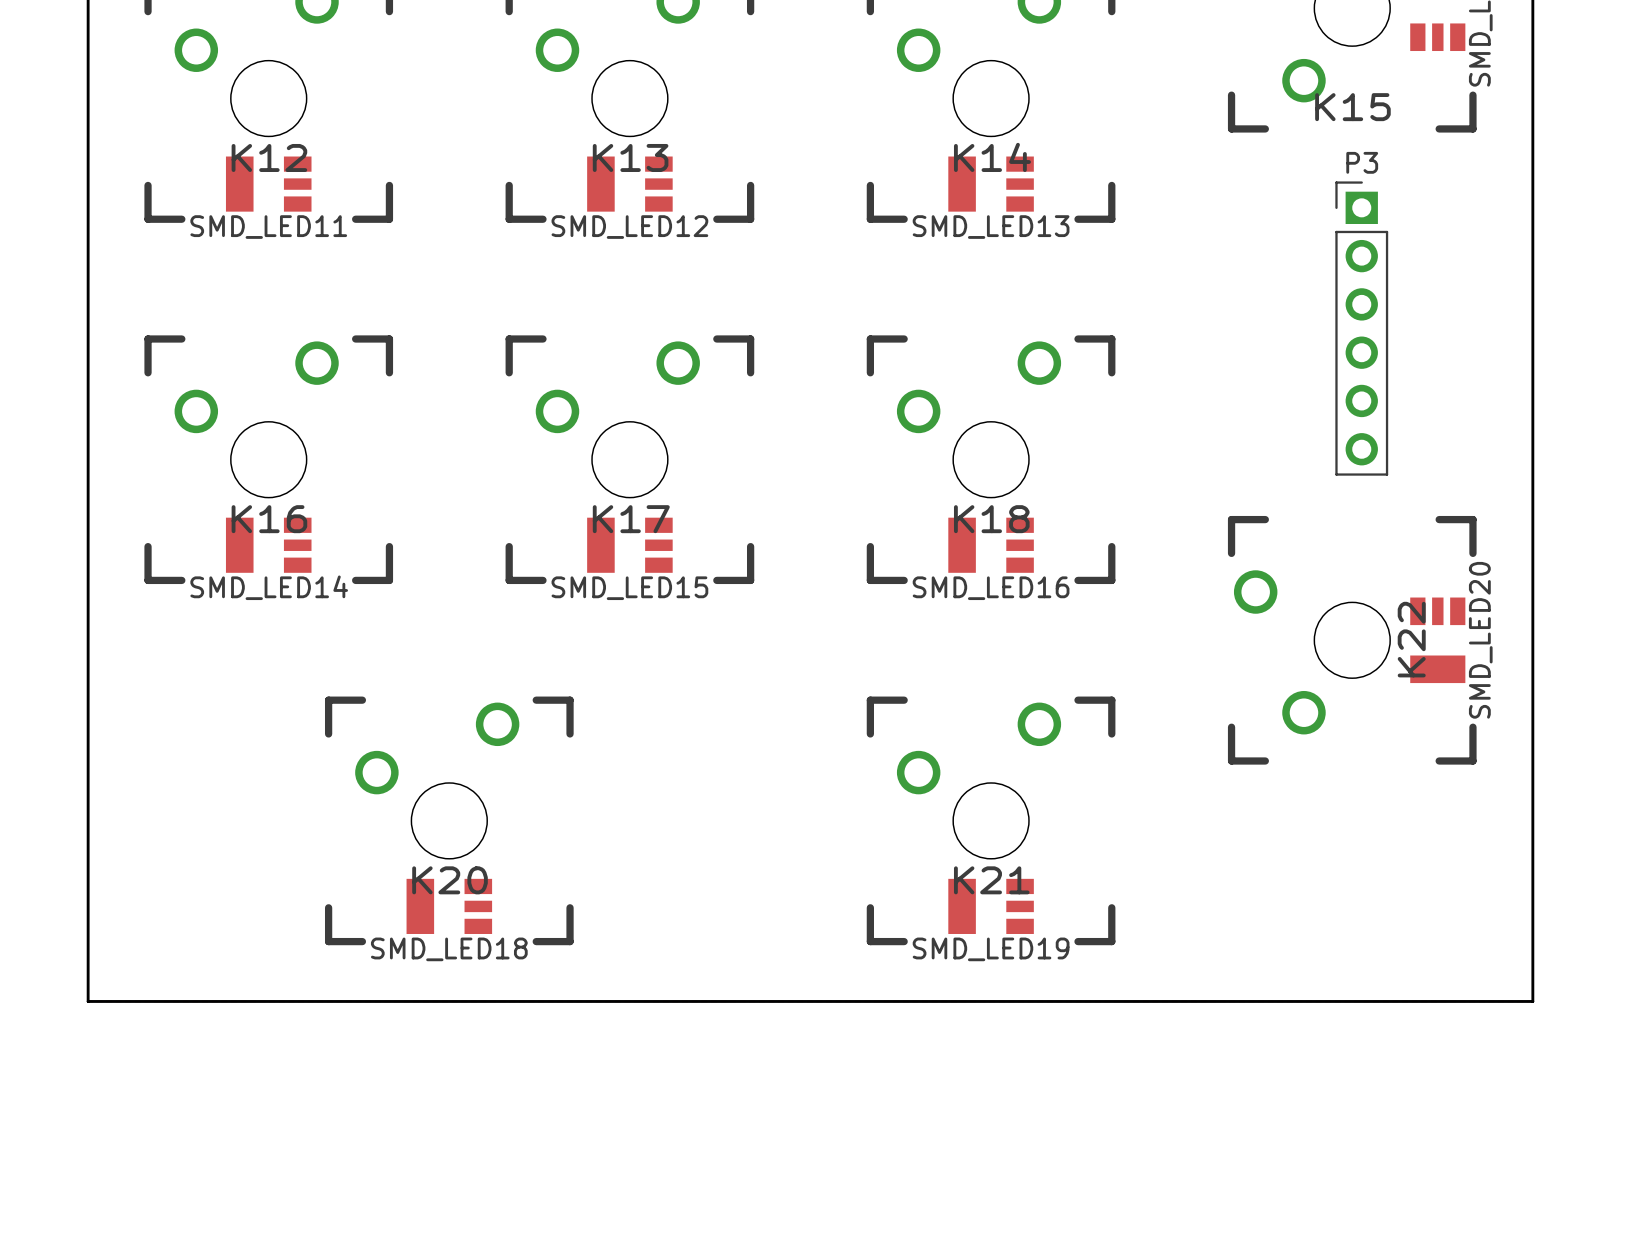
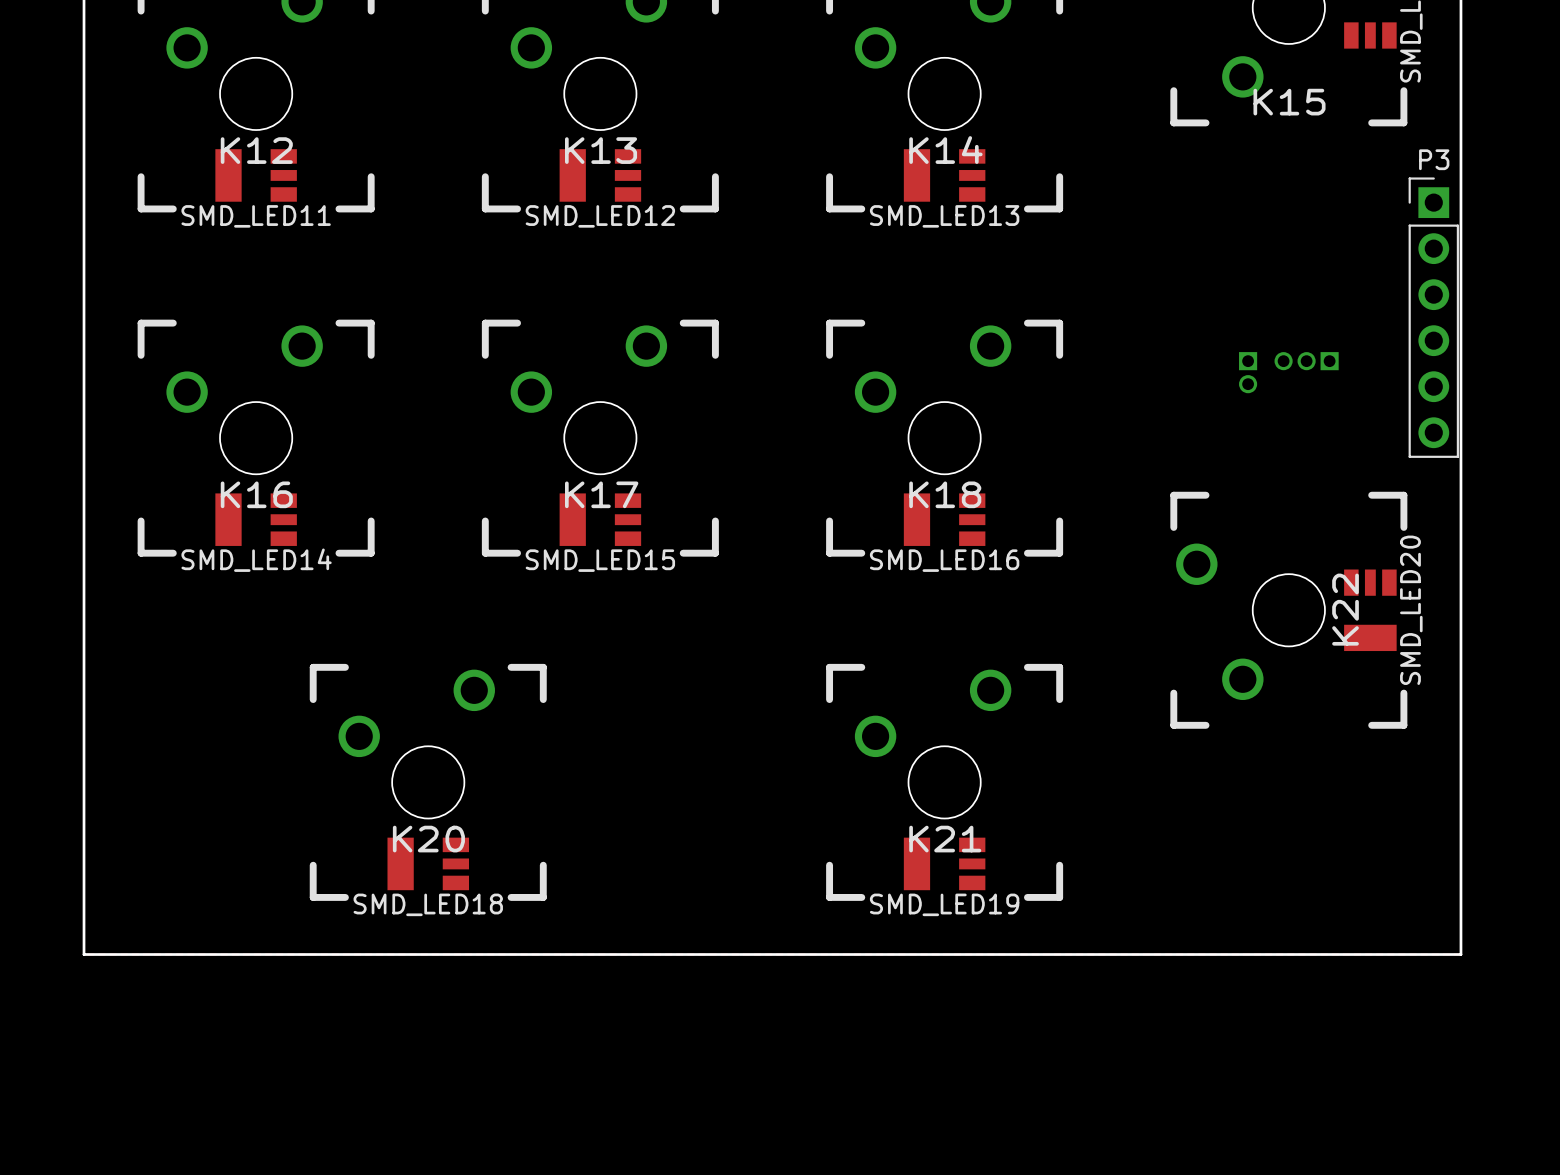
P3 position: (1361, 328) -> (1433, 317)
part: none -> (1306, 361)
part: none -> (1248, 372)

